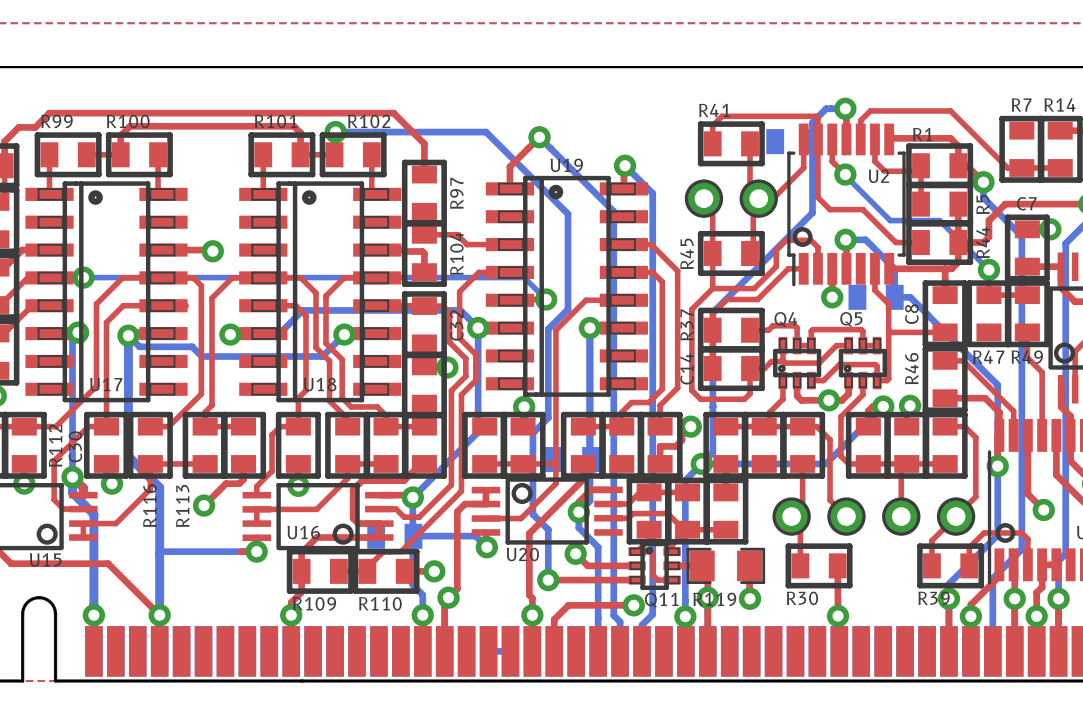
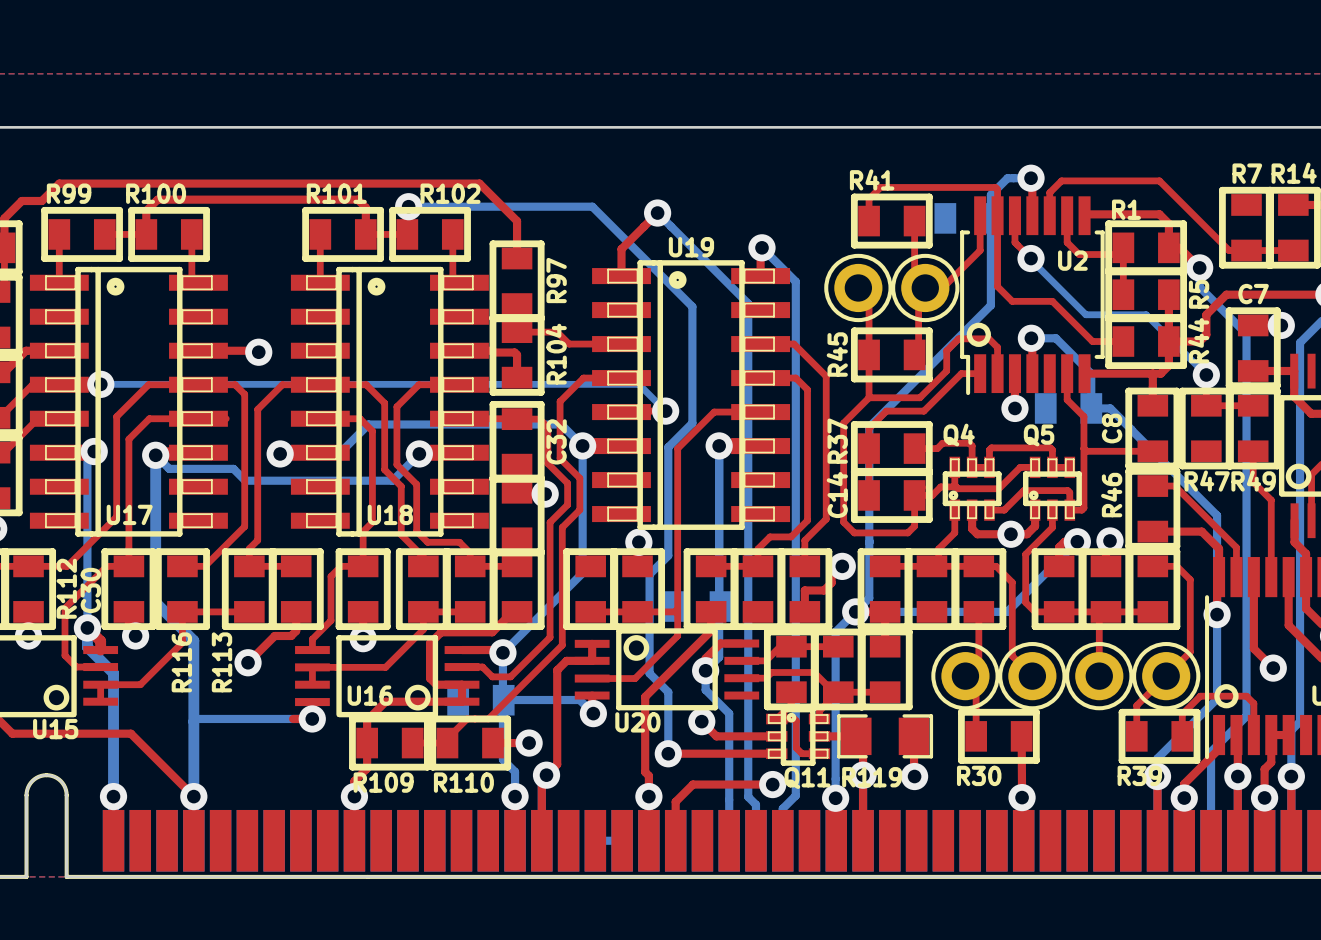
part footprint: [684, 179, 724, 218] -> [824, 253, 893, 323]
part footprint: [739, 179, 778, 218] -> [891, 253, 960, 323]
part footprint: [772, 497, 811, 536] -> [931, 642, 1000, 711]
part footprint: [827, 497, 866, 536] -> [998, 642, 1067, 711]
part footprint: [882, 497, 921, 536] -> [1065, 642, 1134, 711]
part footprint: [936, 497, 976, 536] -> [1132, 642, 1201, 711]

